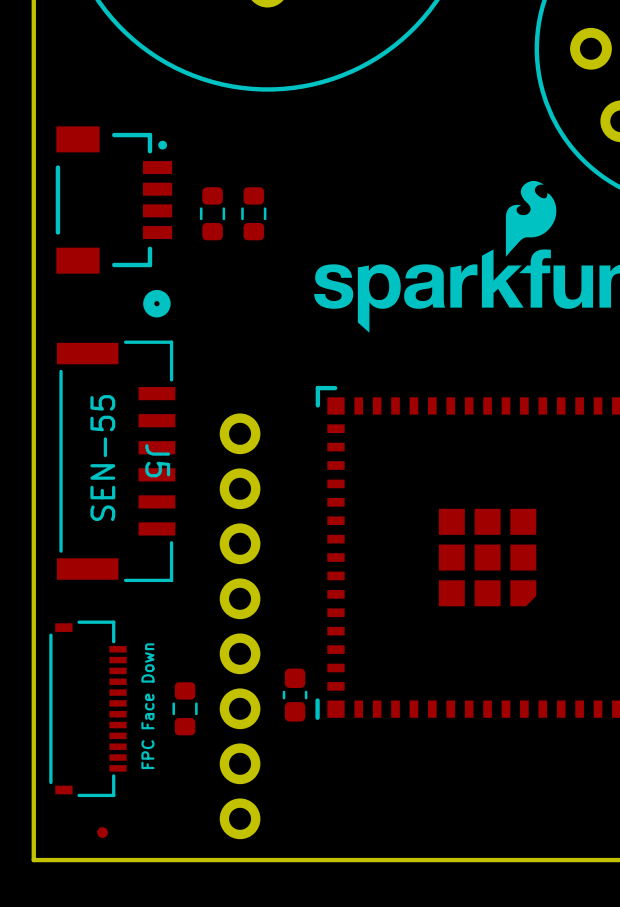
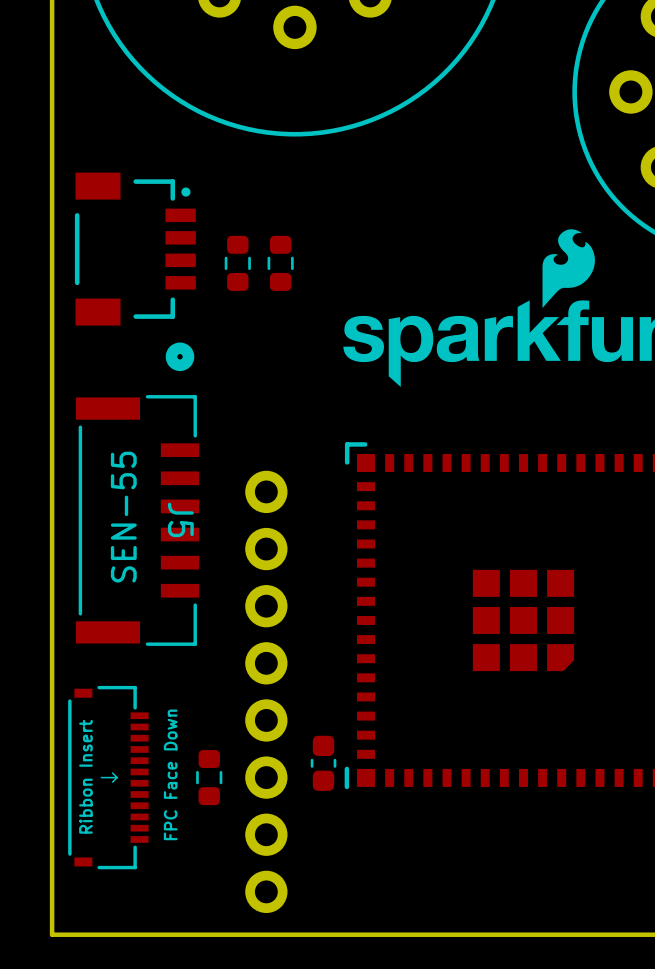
part footprint: [49, 620, 127, 798] -> [68, 685, 149, 870]
part: (102, 832) -> none

